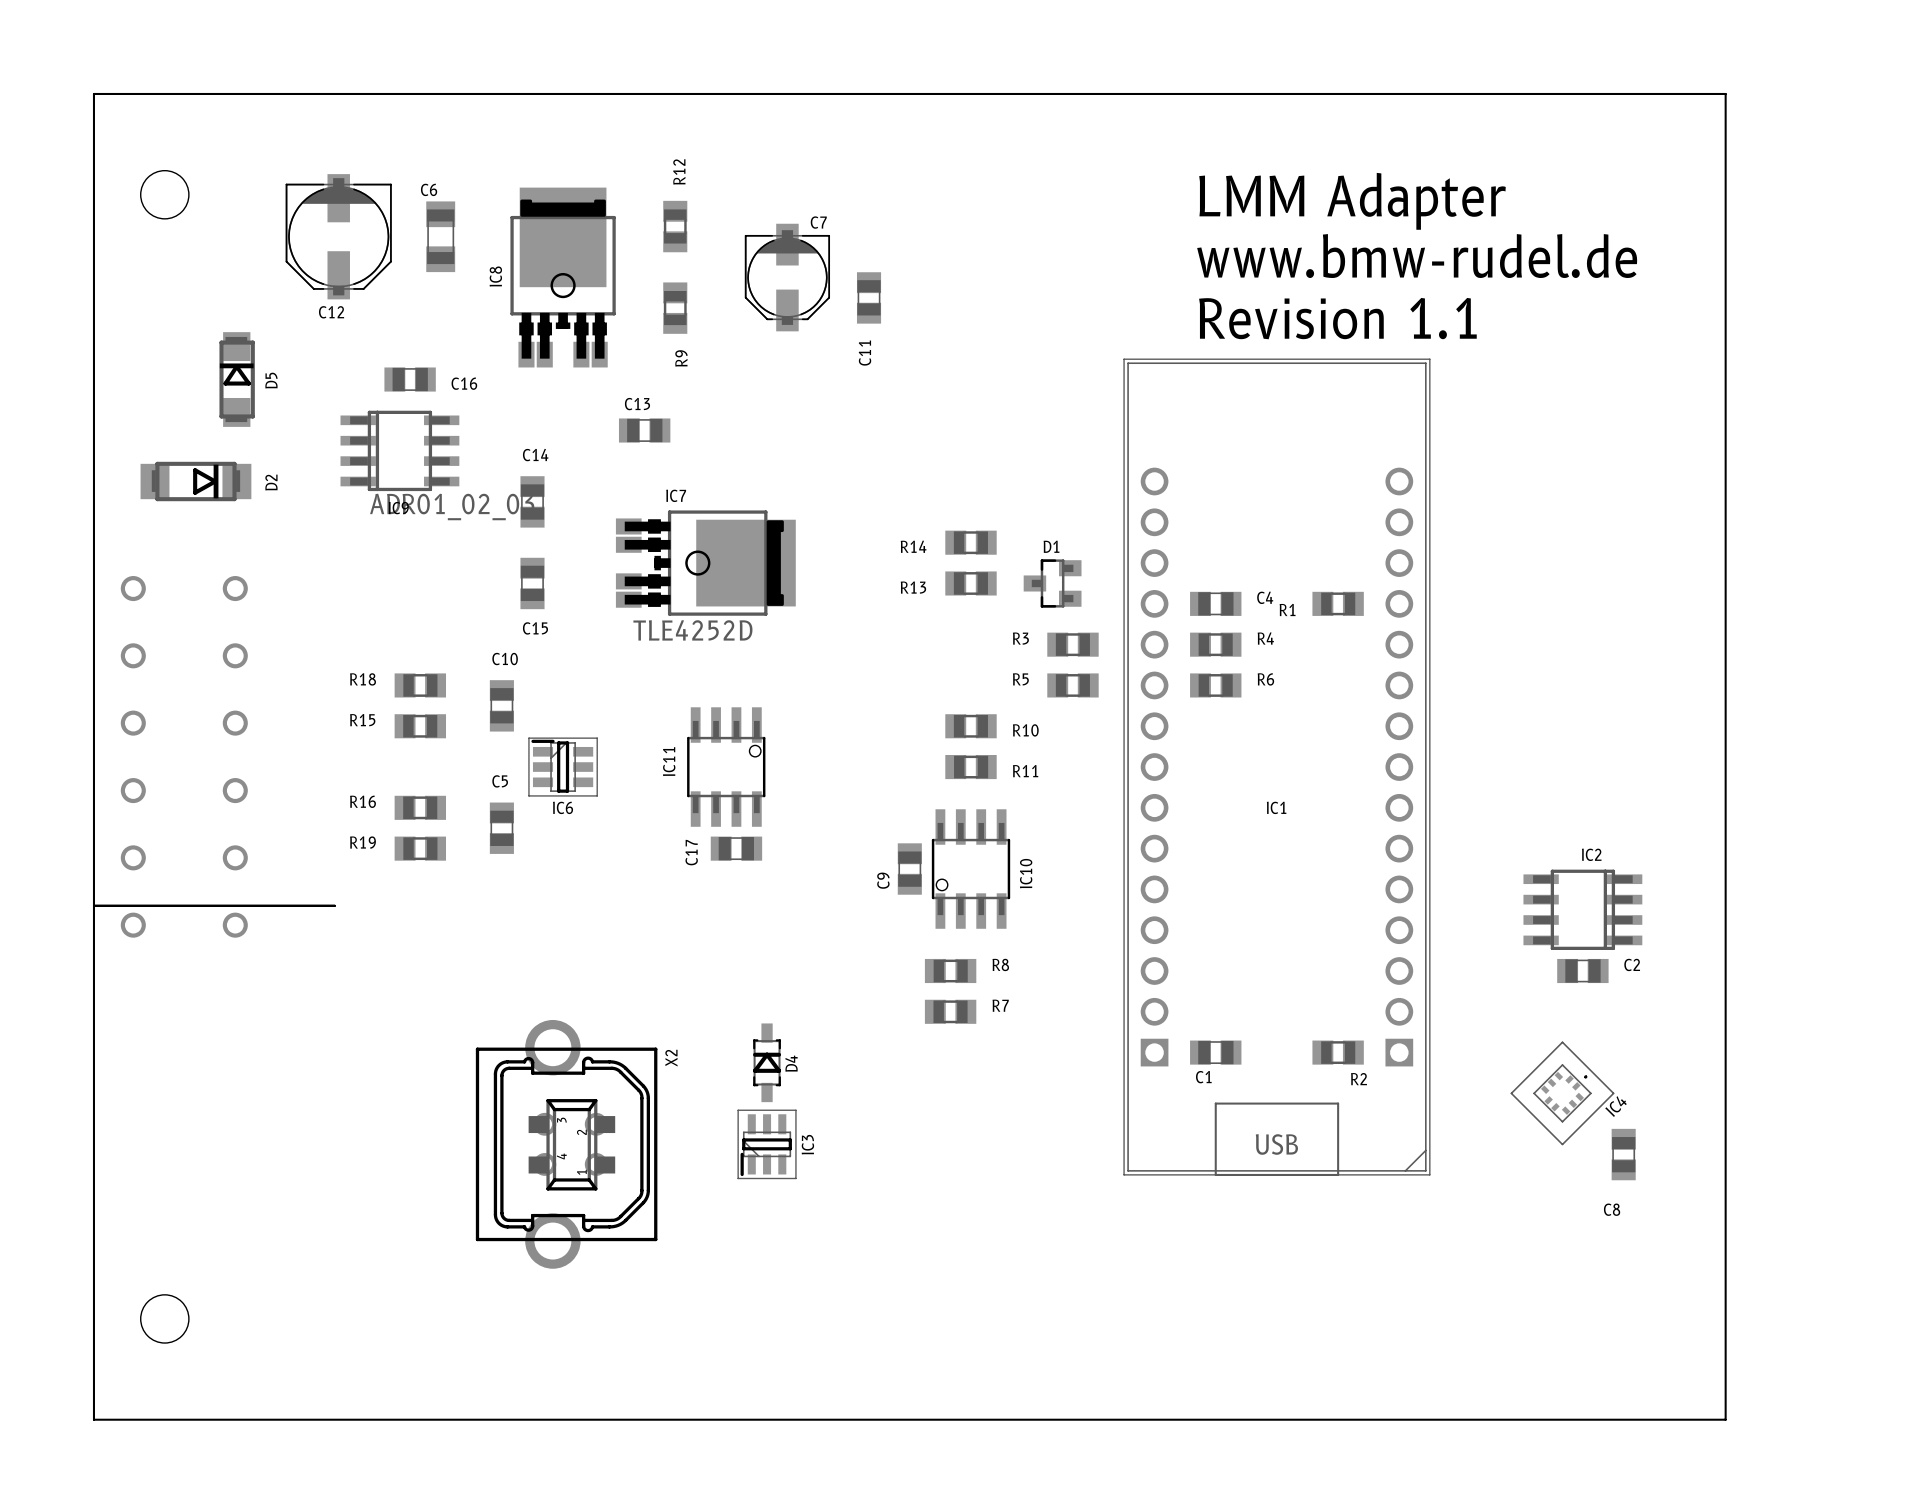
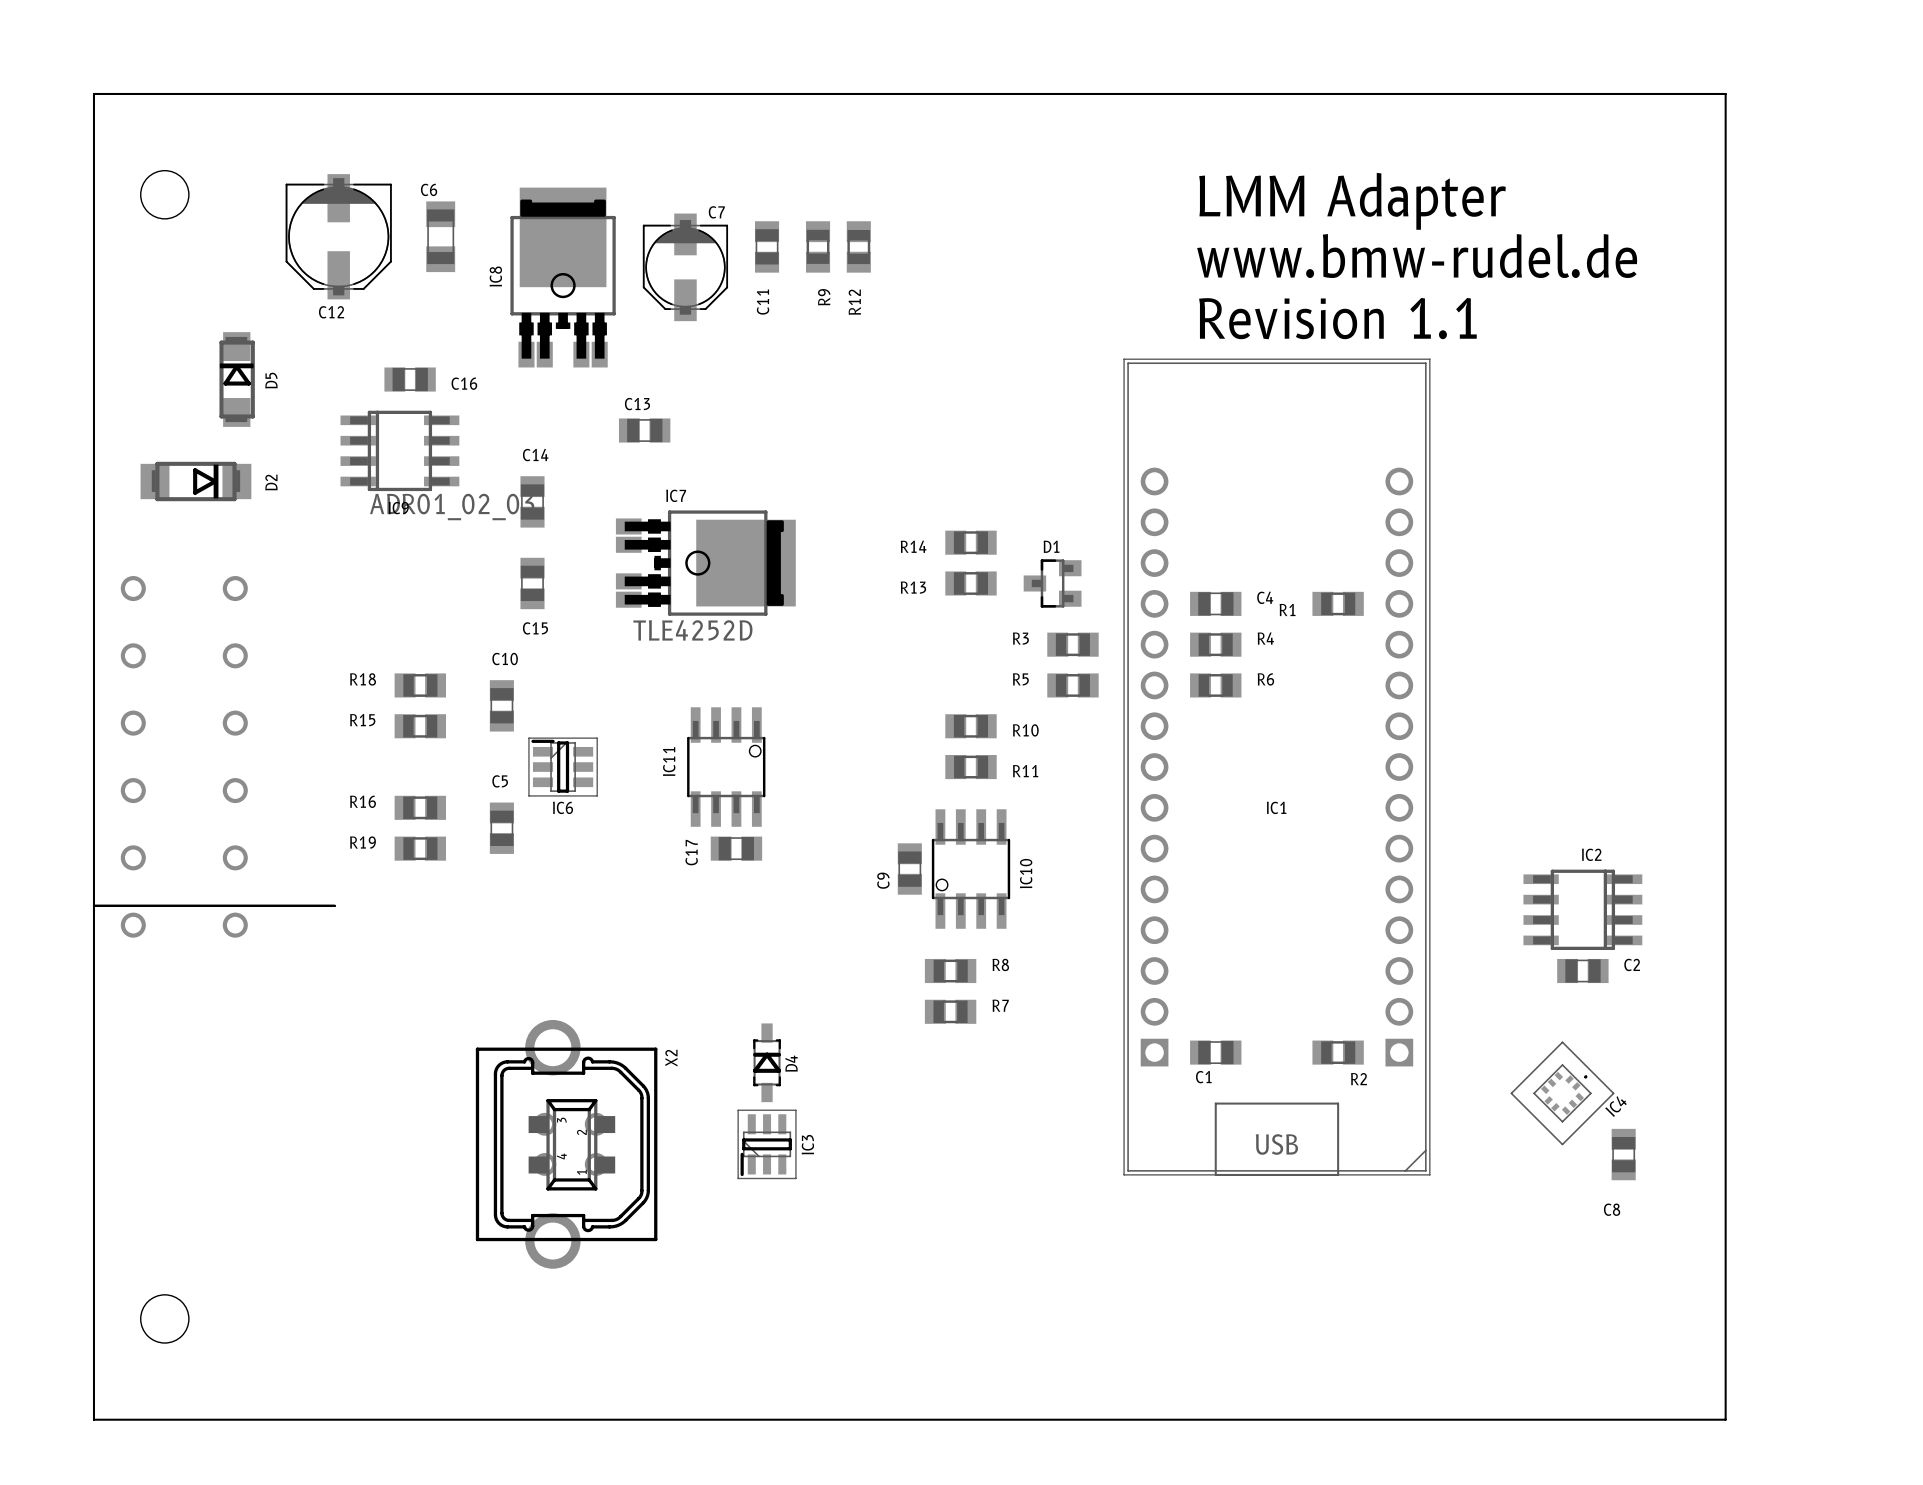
R12 name position: R12 (679, 171) -> R12 (854, 302)
R12 position: (675, 226) -> (858, 246)
C7 position: (787, 277) -> (685, 267)
C11 position: (869, 297) -> (767, 246)
R9 position: (675, 308) -> (818, 246)

